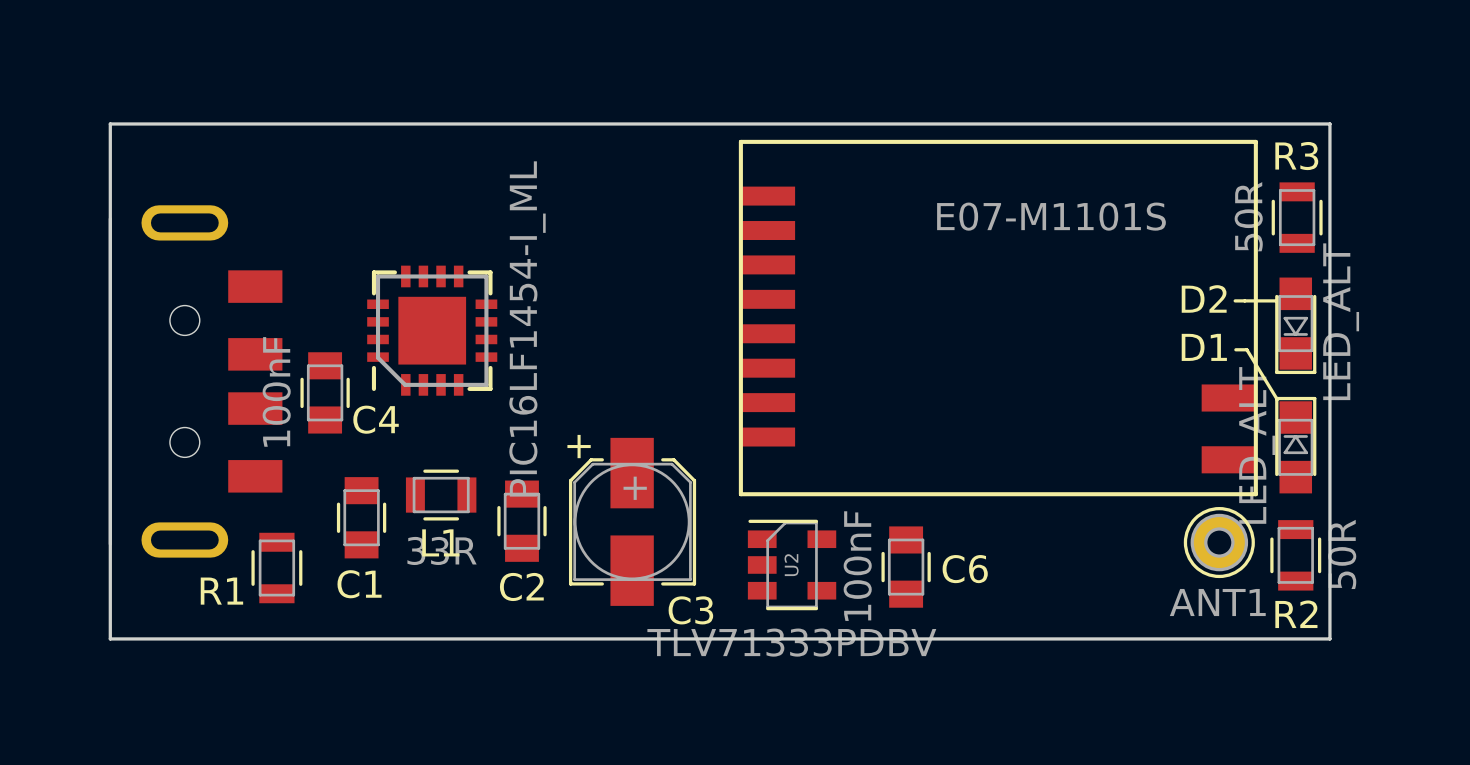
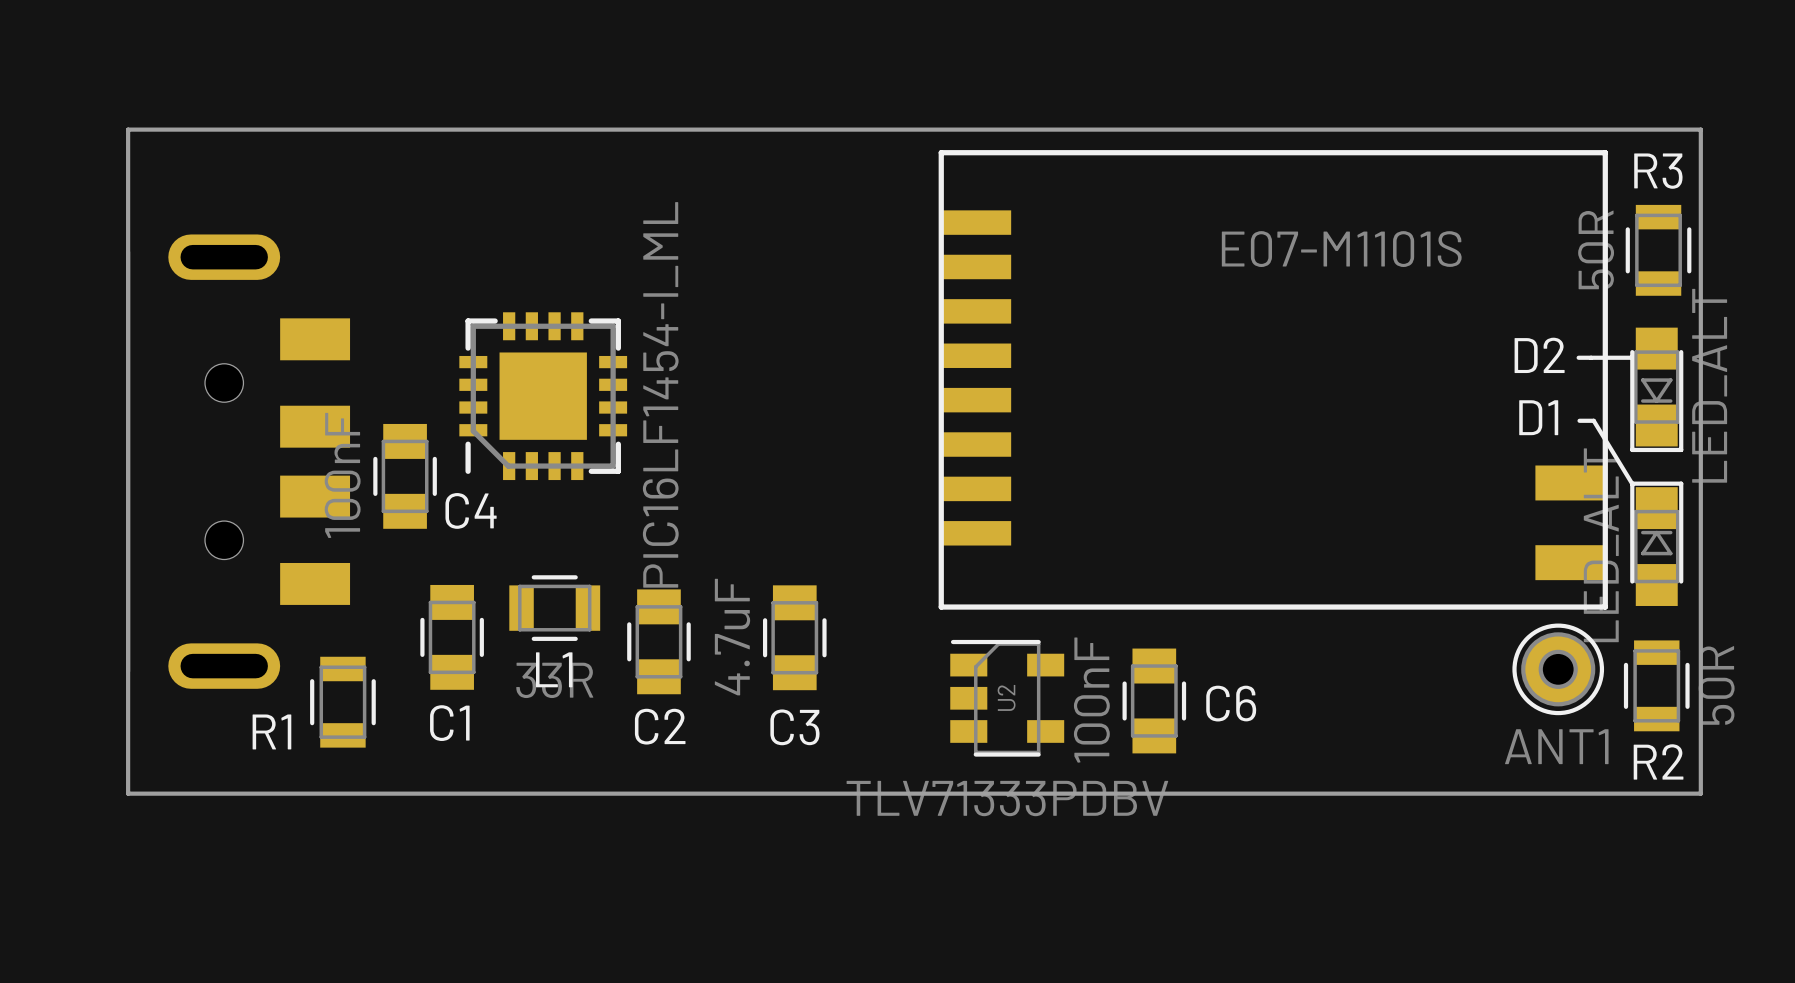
C3 footprint: [568, 437, 697, 606] -> [762, 585, 827, 691]
C3 value: none -> 4.7uF (732, 637)
C3 name position: C3 (690, 610) -> C3 (794, 727)

